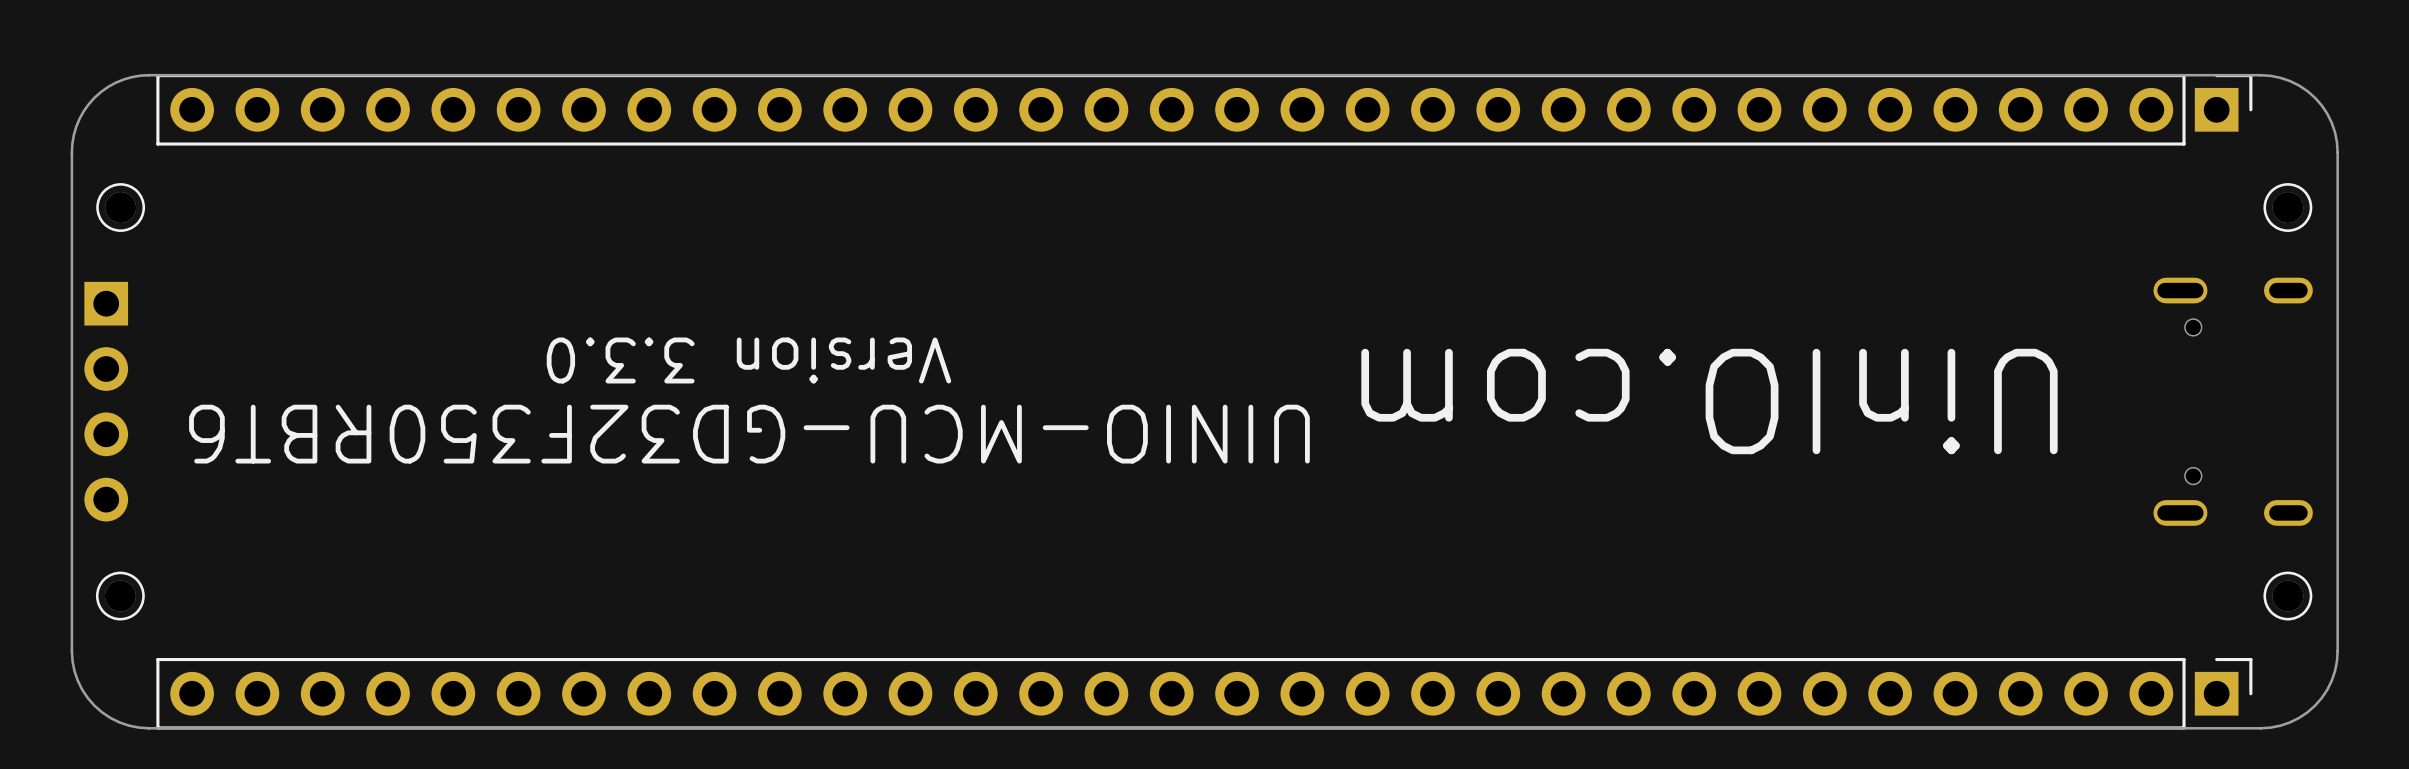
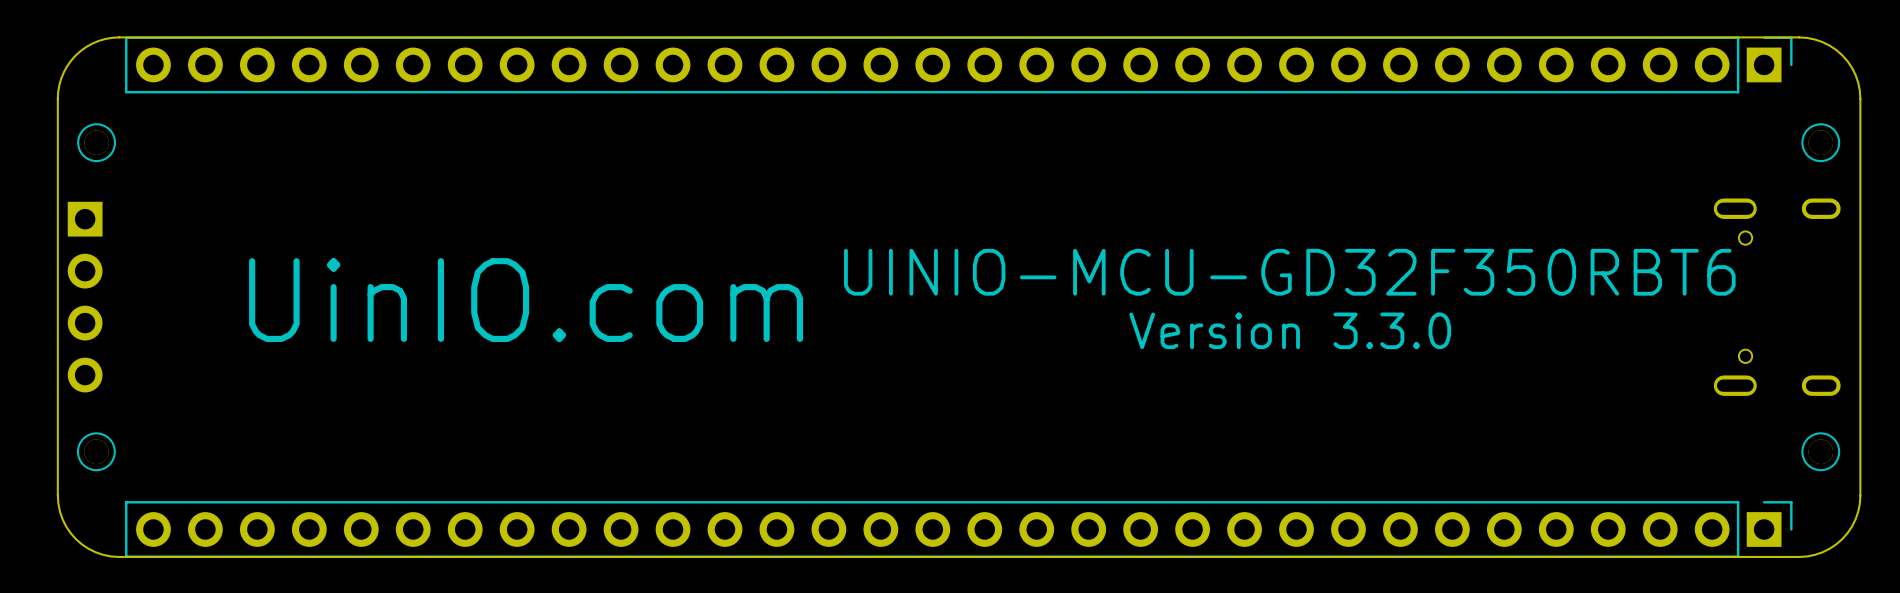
text rotation: 0° (748, 360) -> 180° (1290, 330)
text position: Version 3.3.0 (748, 360) -> Version 3.3.0 (1290, 330)
text: UinIO.com (1709, 401) -> none
text: none -> UinIO.com (526, 300)
text rotation: 0° (749, 434) -> 180° (1289, 272)

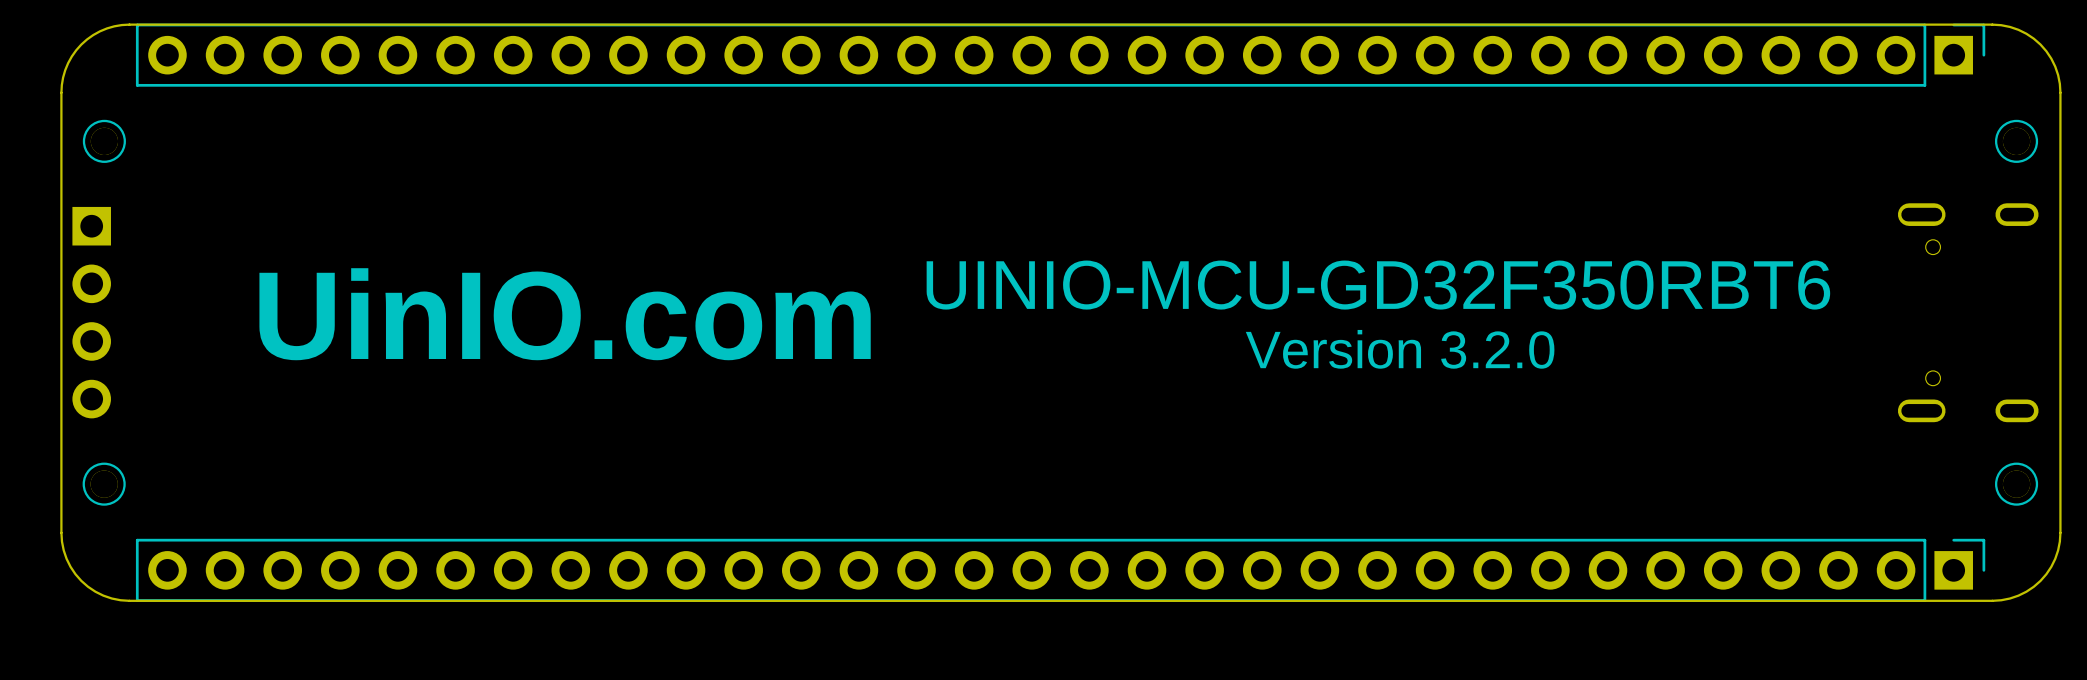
text: Version 3.3.0 (1290, 330) -> Version 3.2.0 (1400, 349)

